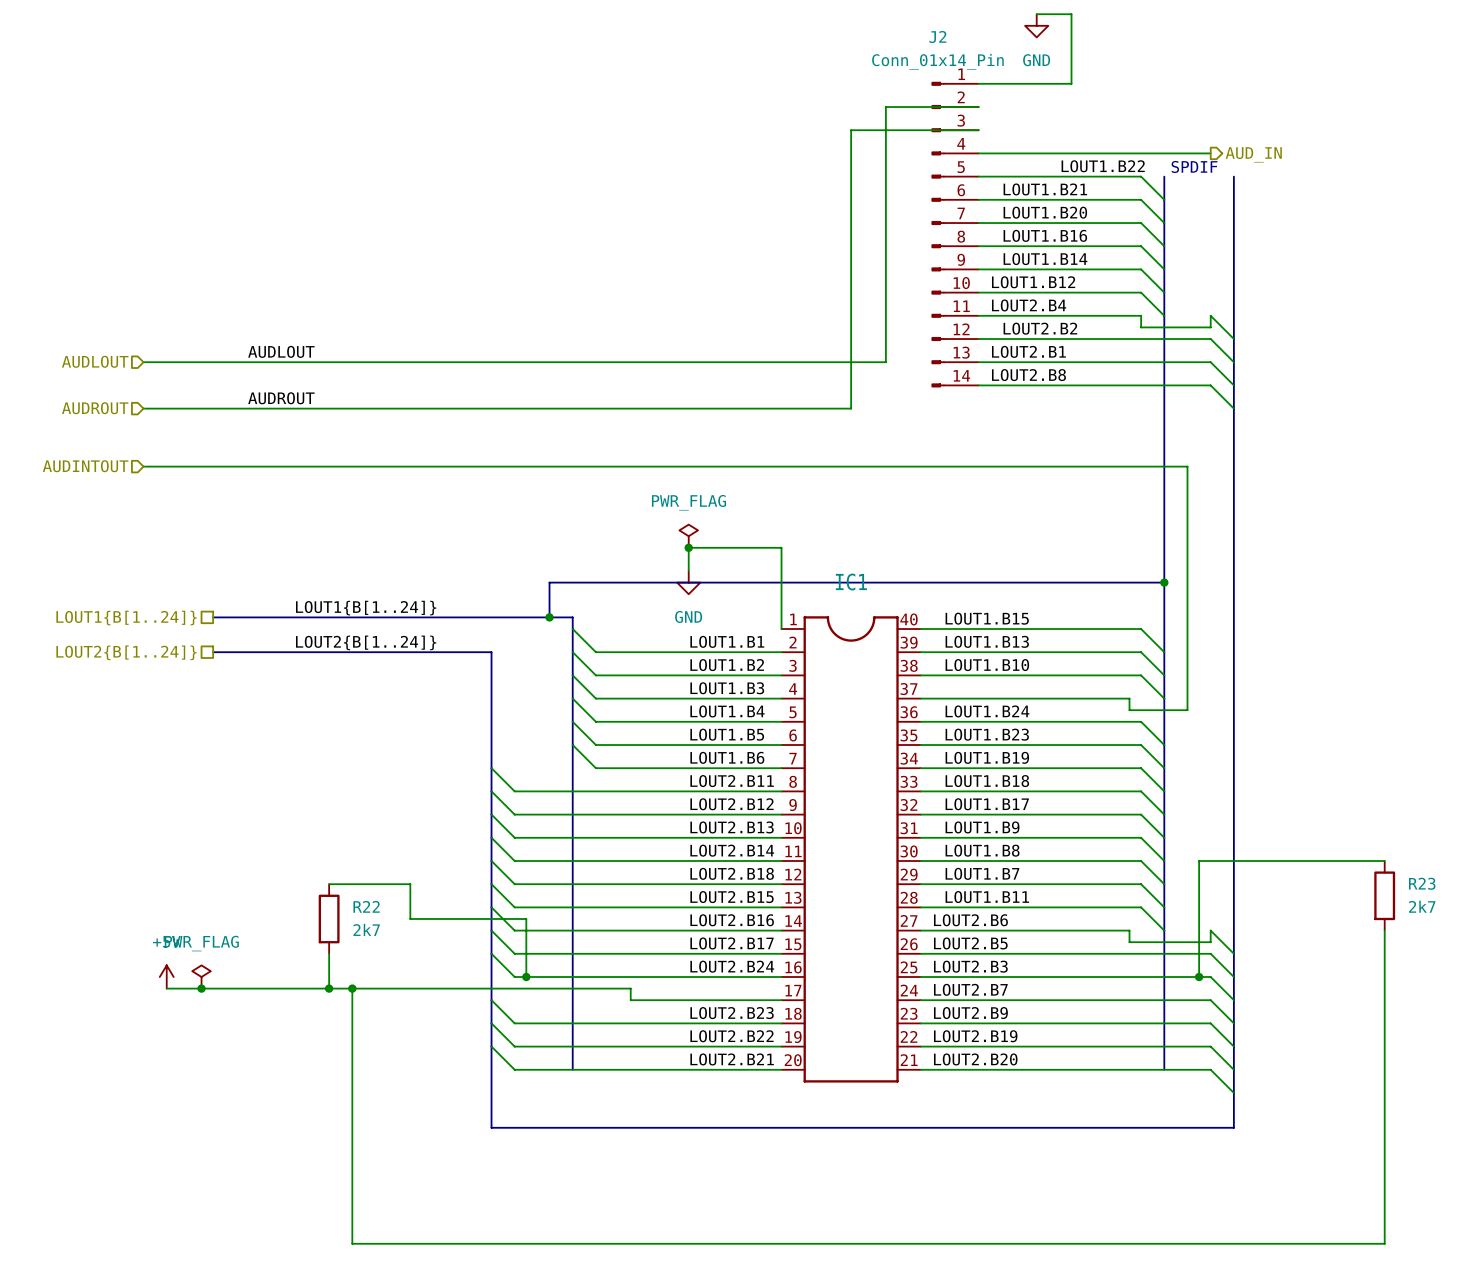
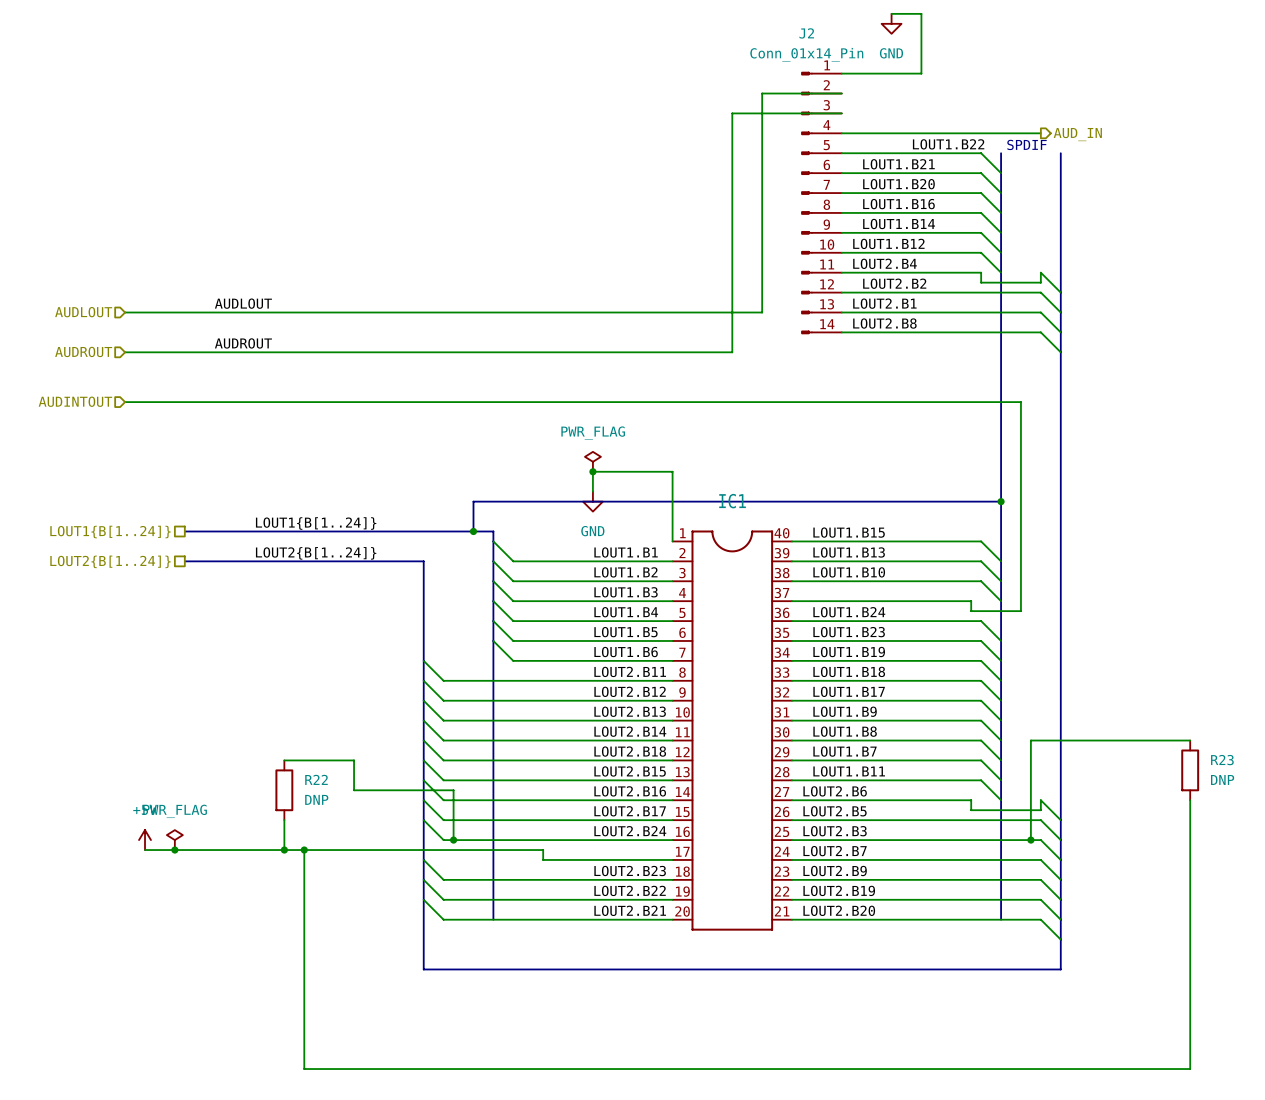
R23 value: 2k7 (1422, 906) -> DNP (1222, 779)
R22 value: 2k7 (366, 929) -> DNP (316, 799)

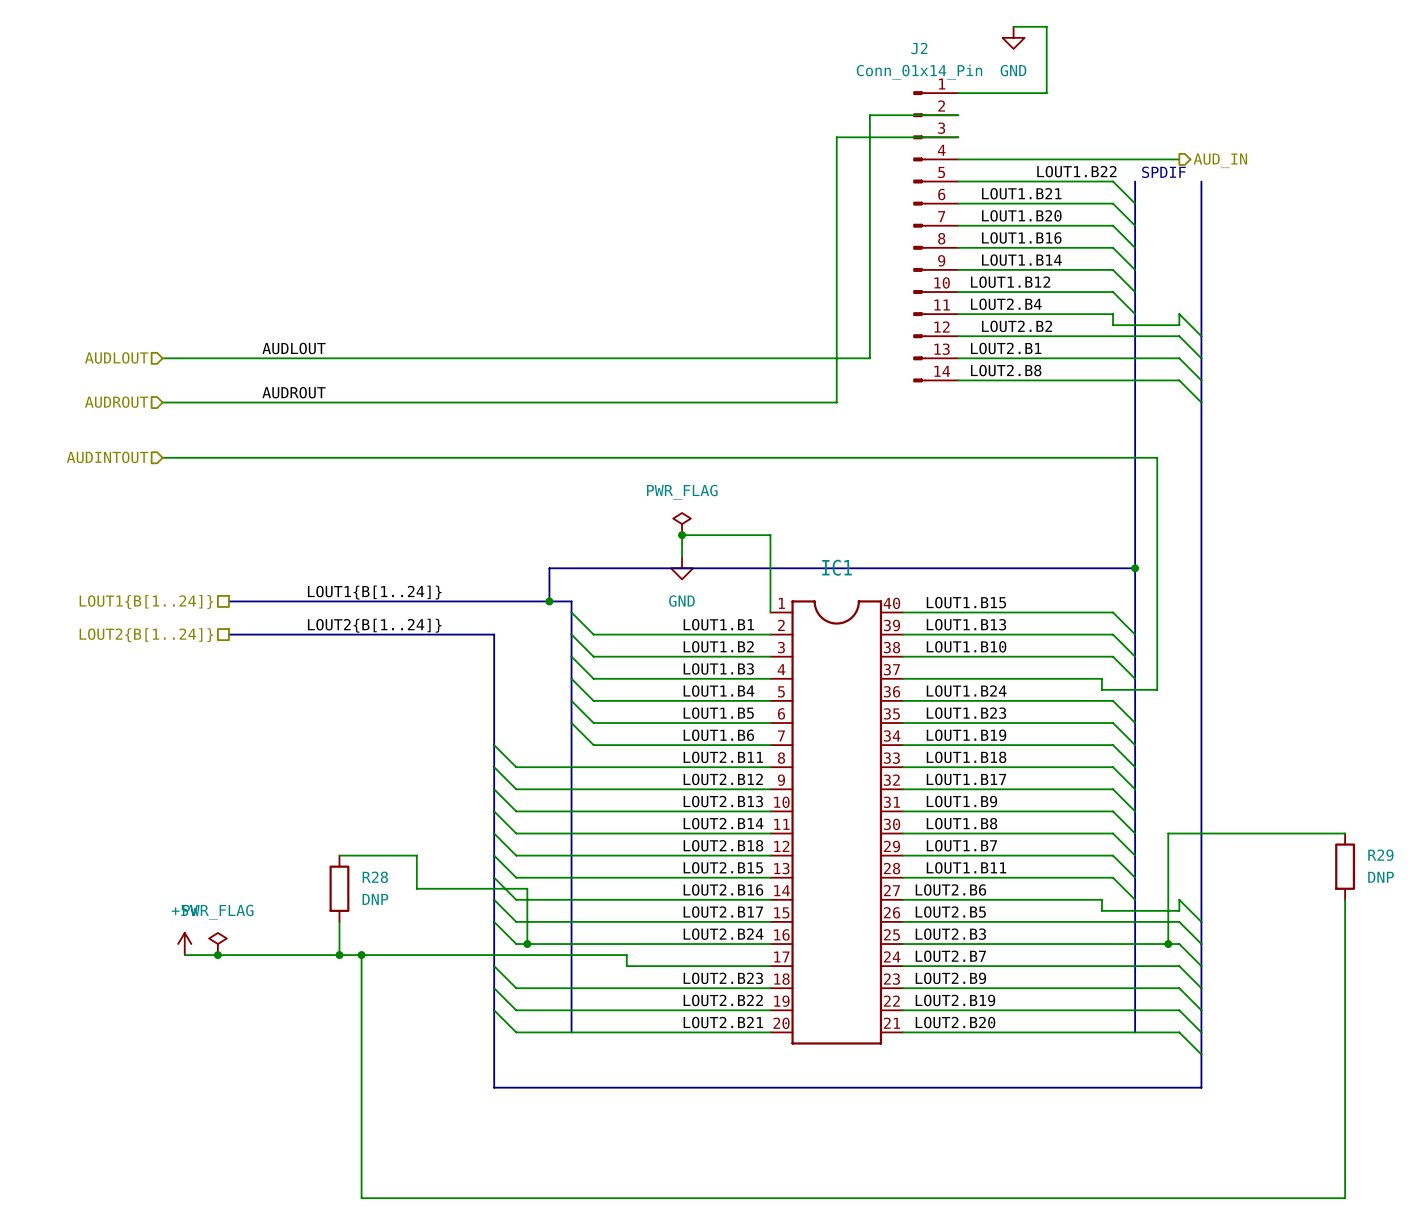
R23 name: R23 (1222, 760) -> R29 (1380, 855)
R22 name: R22 (316, 779) -> R28 (375, 877)

